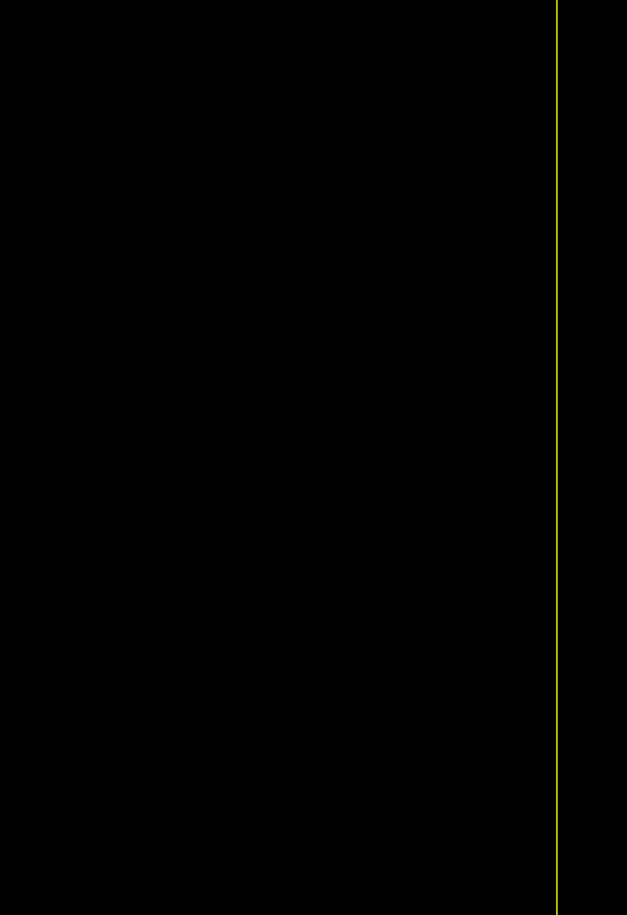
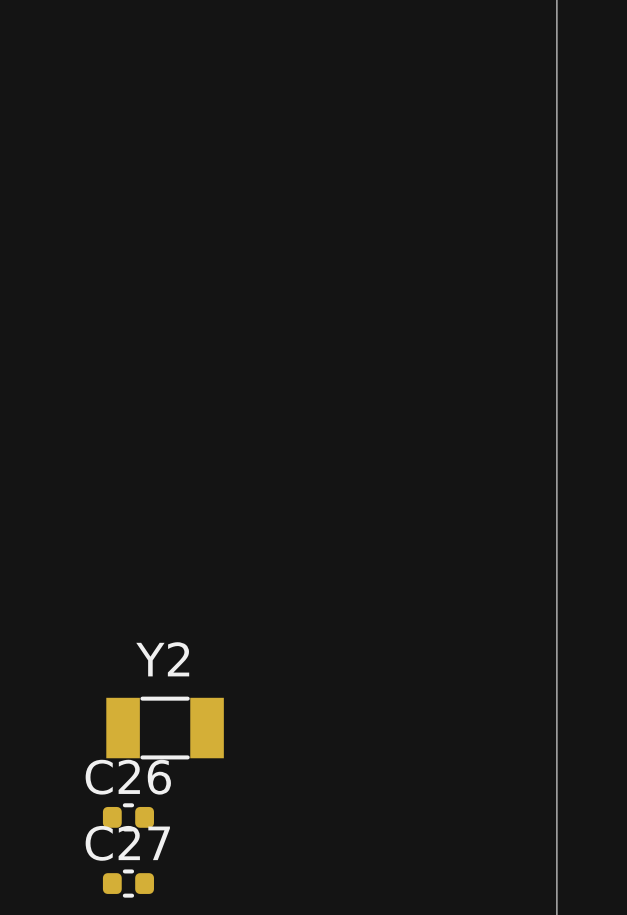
Y2: none -> (165, 728)
C26: none -> (128, 817)
C27: none -> (128, 883)

